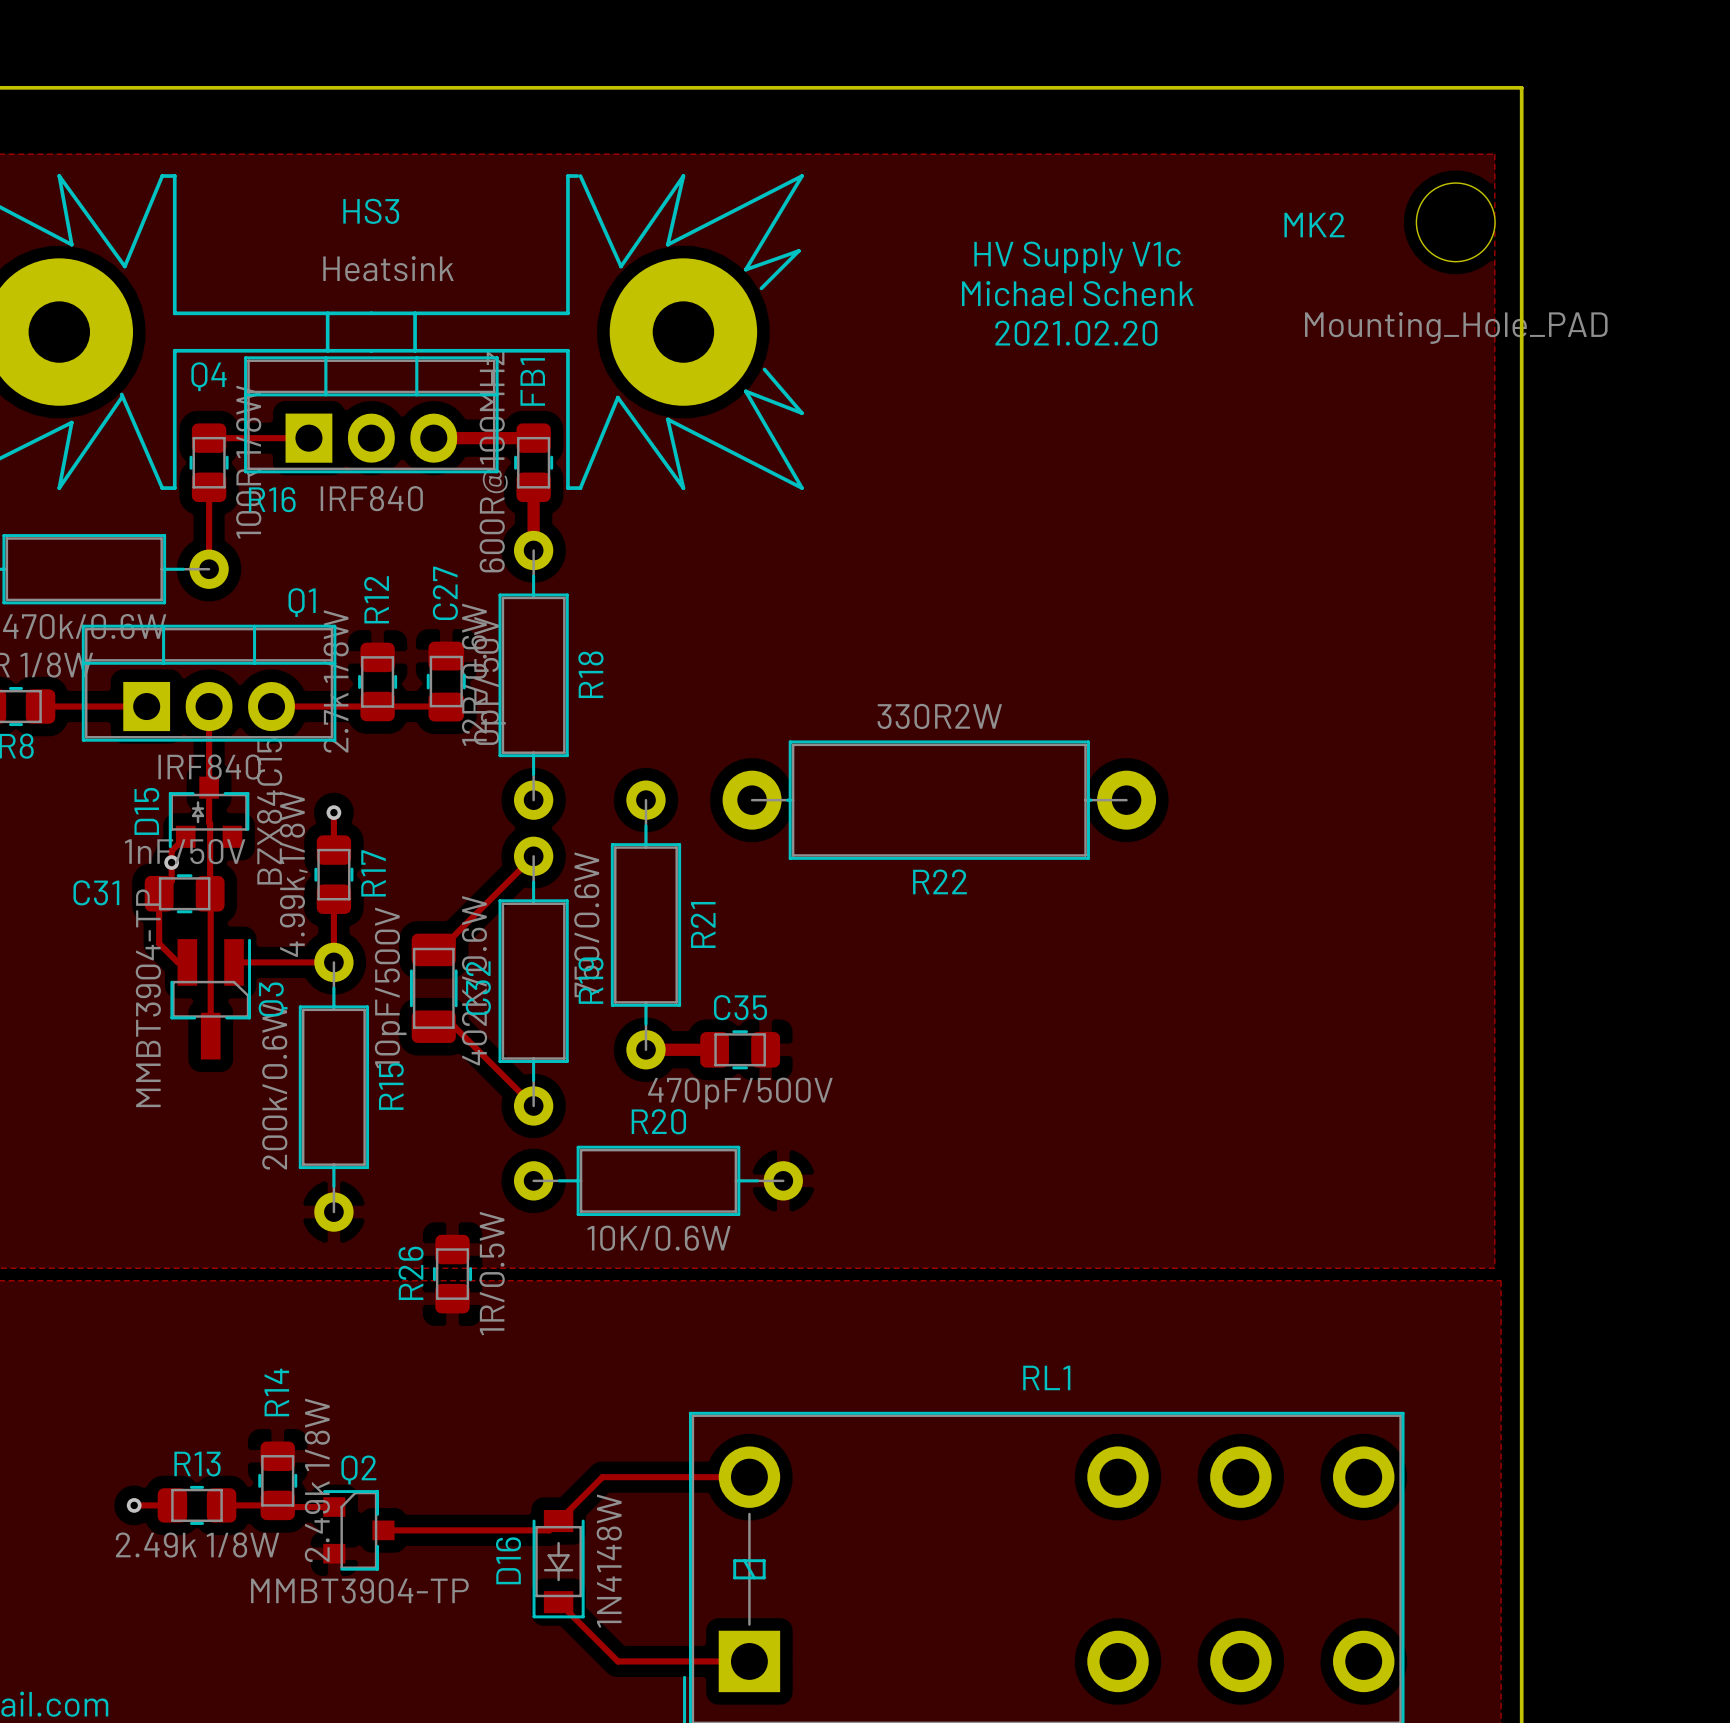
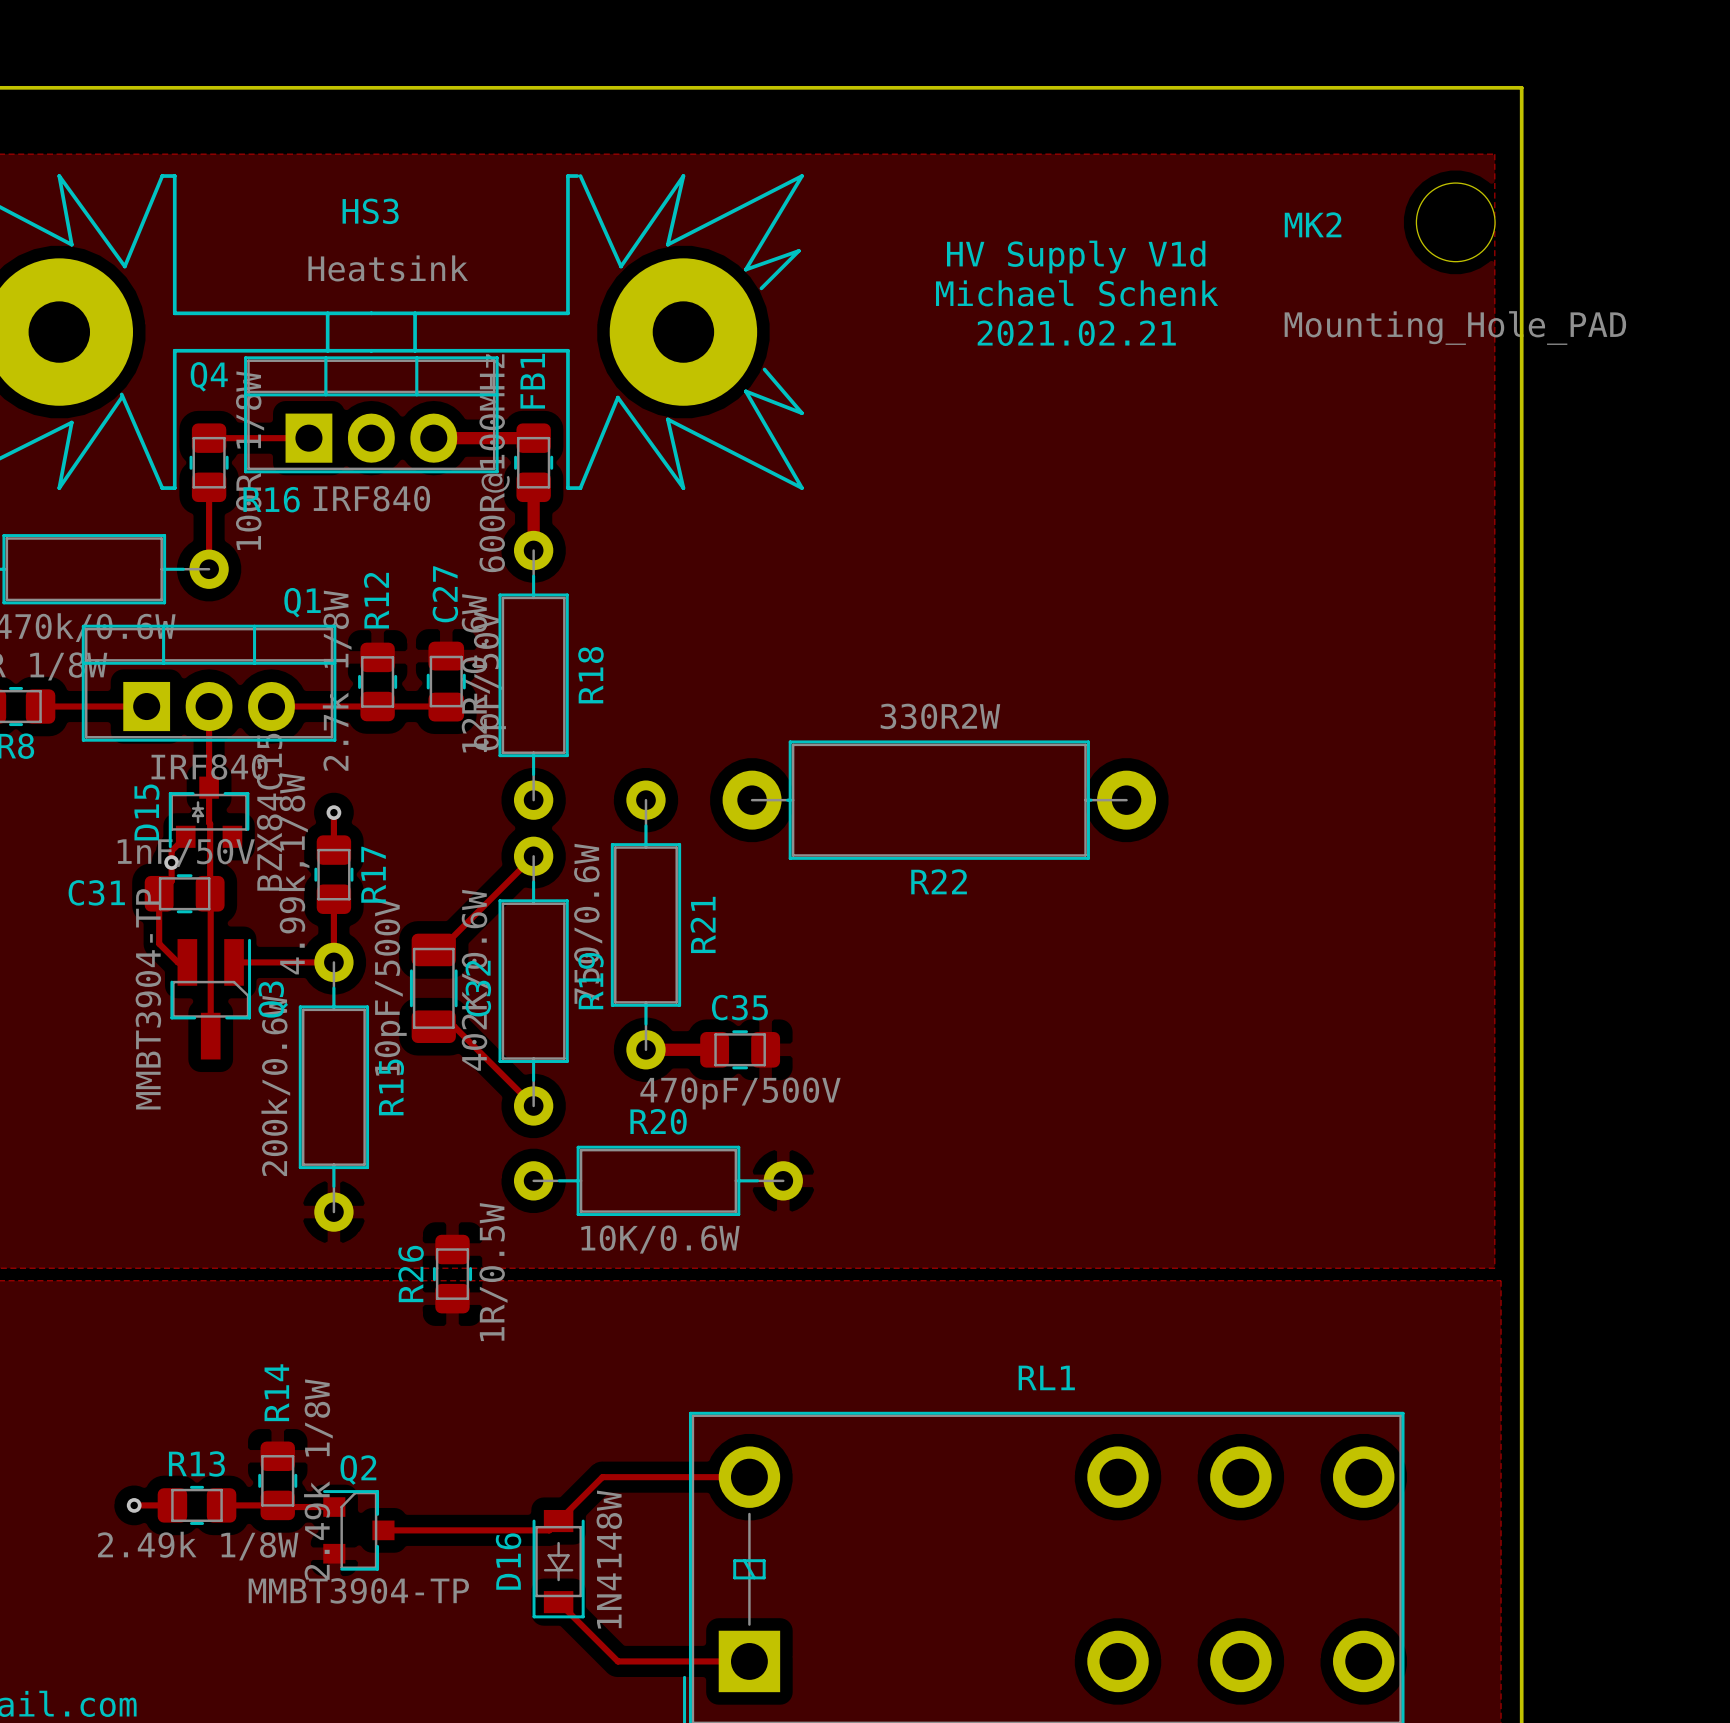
text: HV Supply V1c (1077, 257) -> HV Supply V1d (1076, 257)
text: 2021.02.20 (1076, 333) -> 2021.02.21 (1076, 333)

